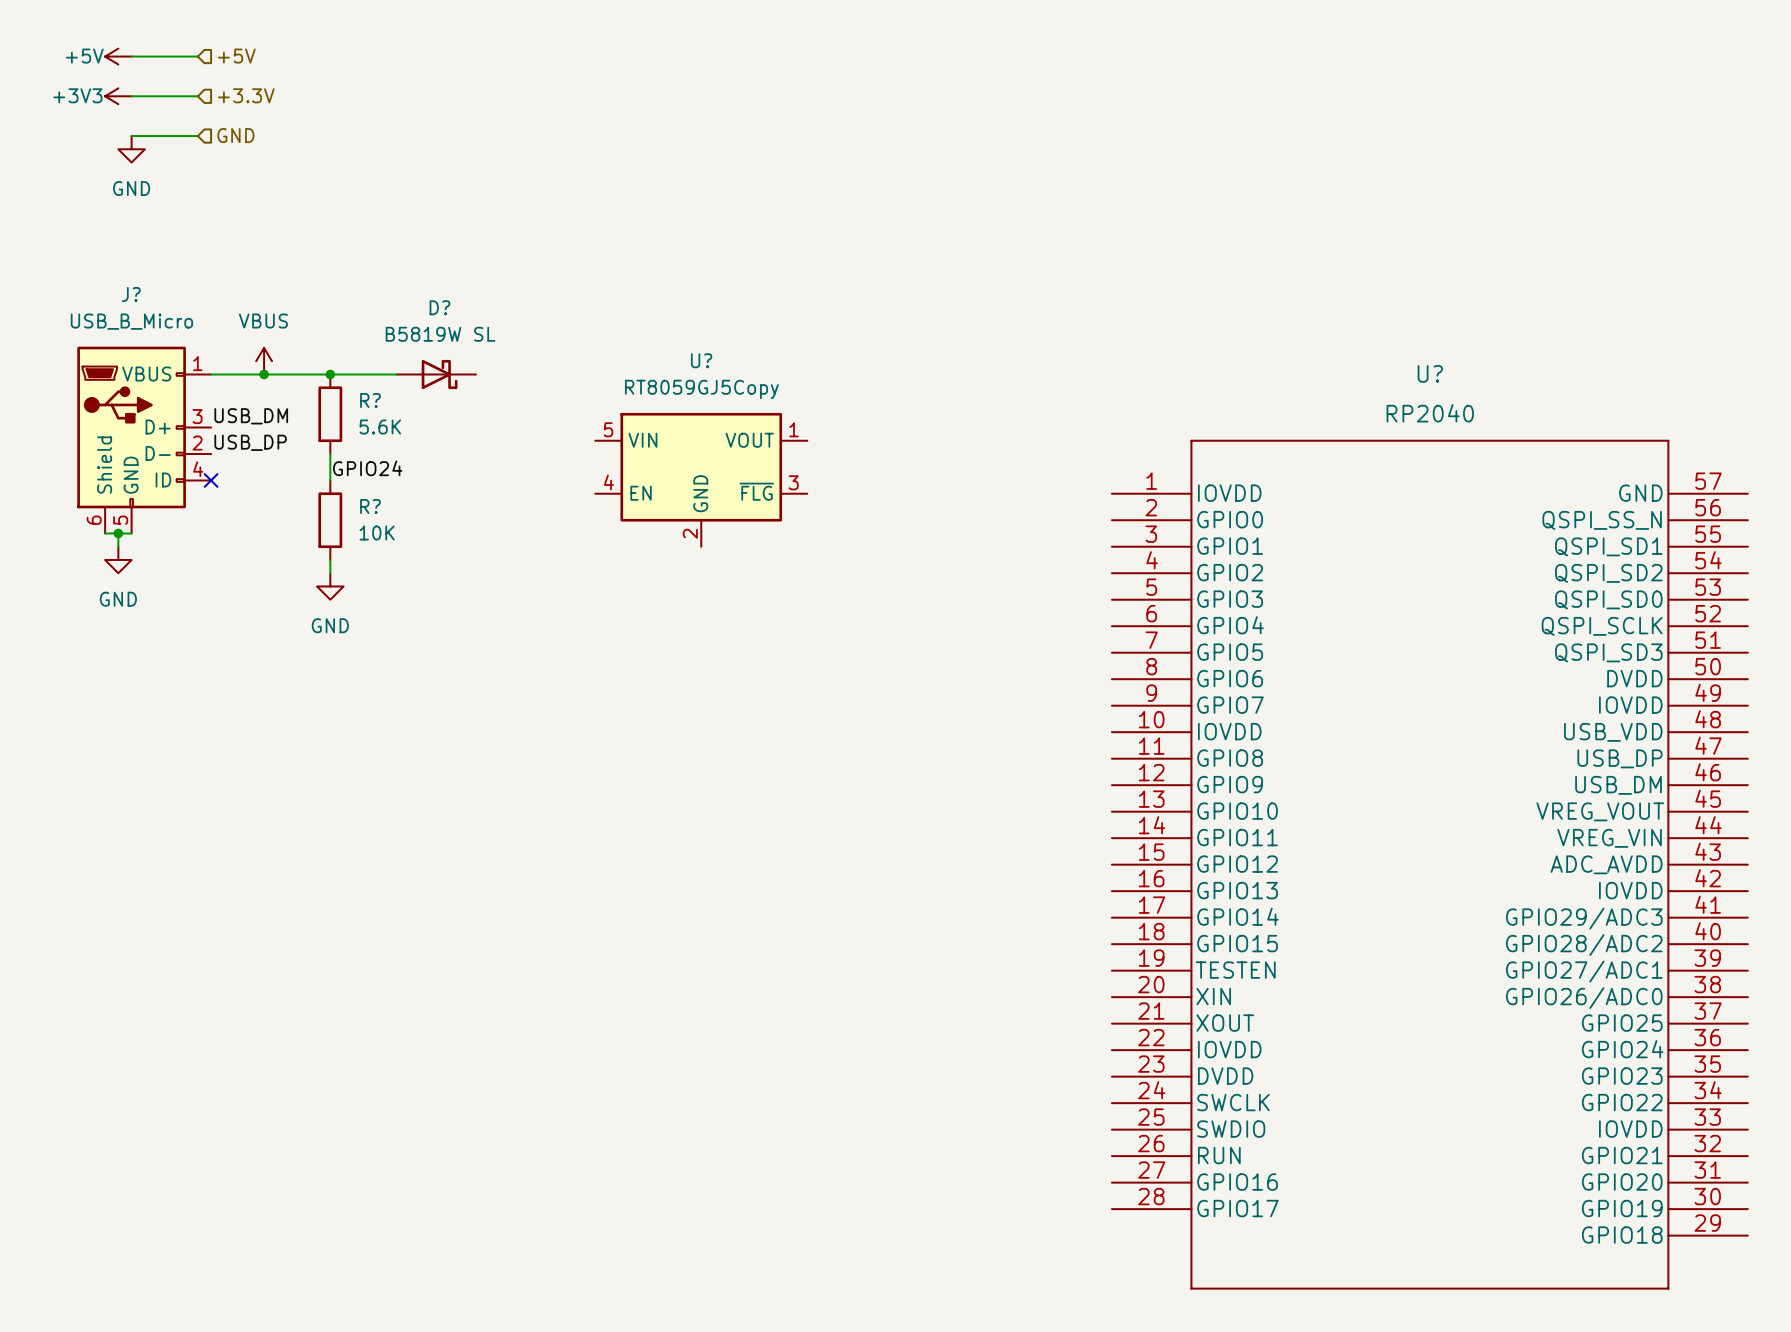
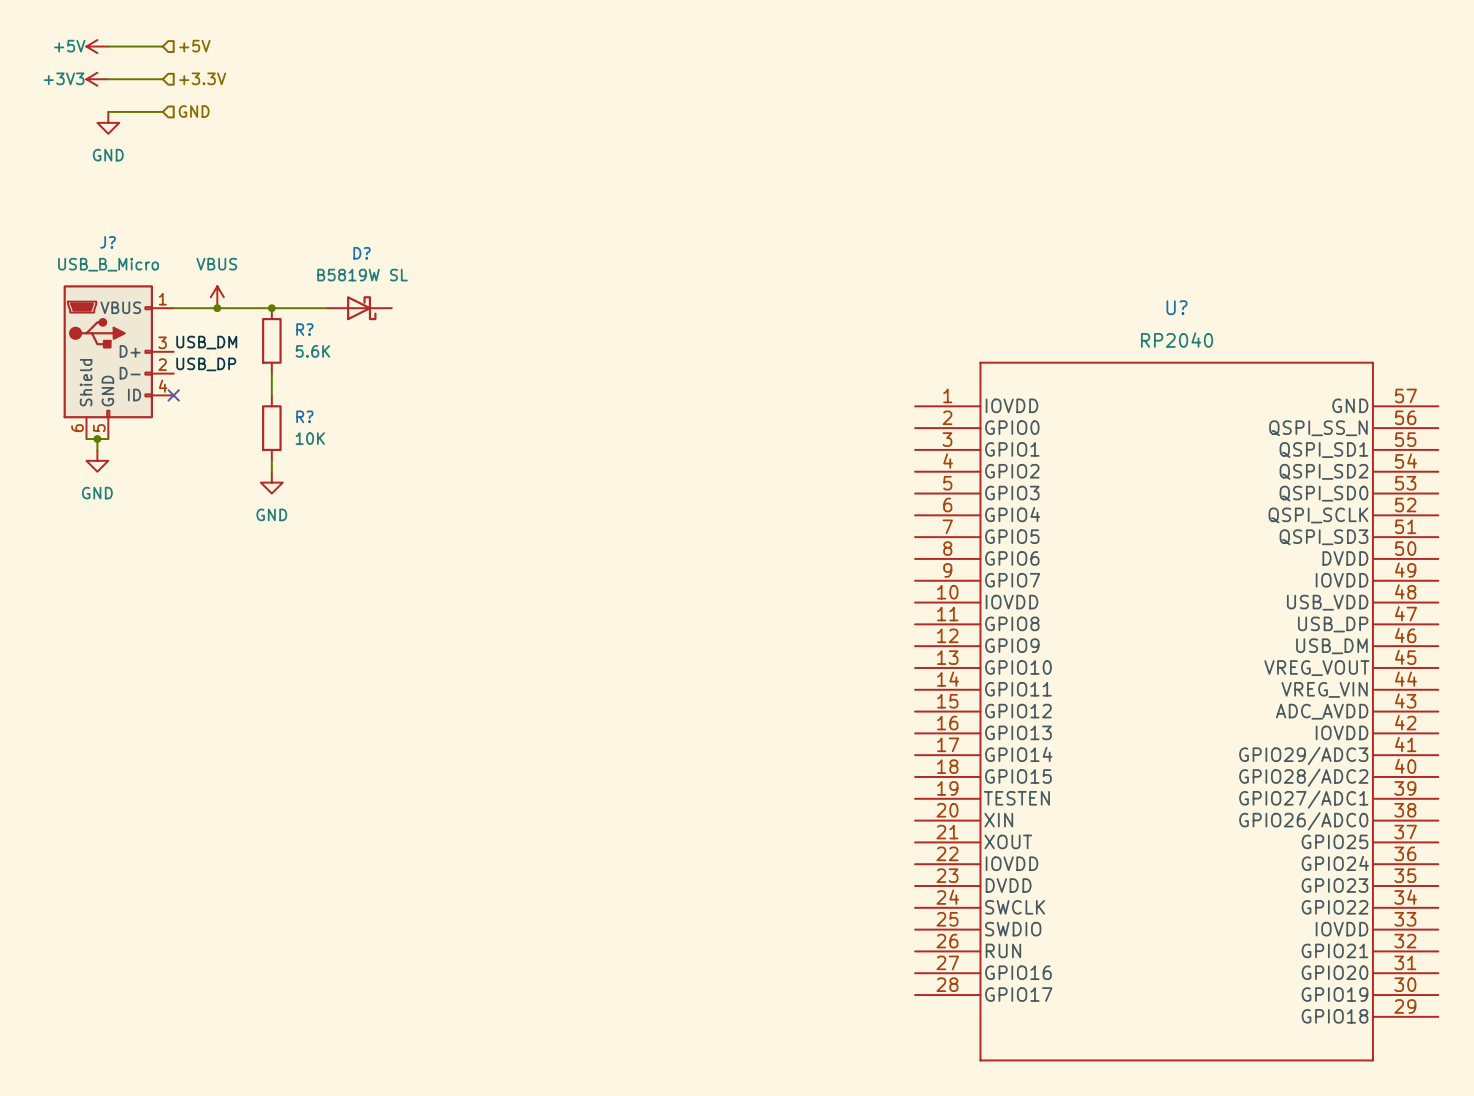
label: GPIO24 (367, 468) -> none
U?: RT8059GJ5Copy (701, 479) -> none

